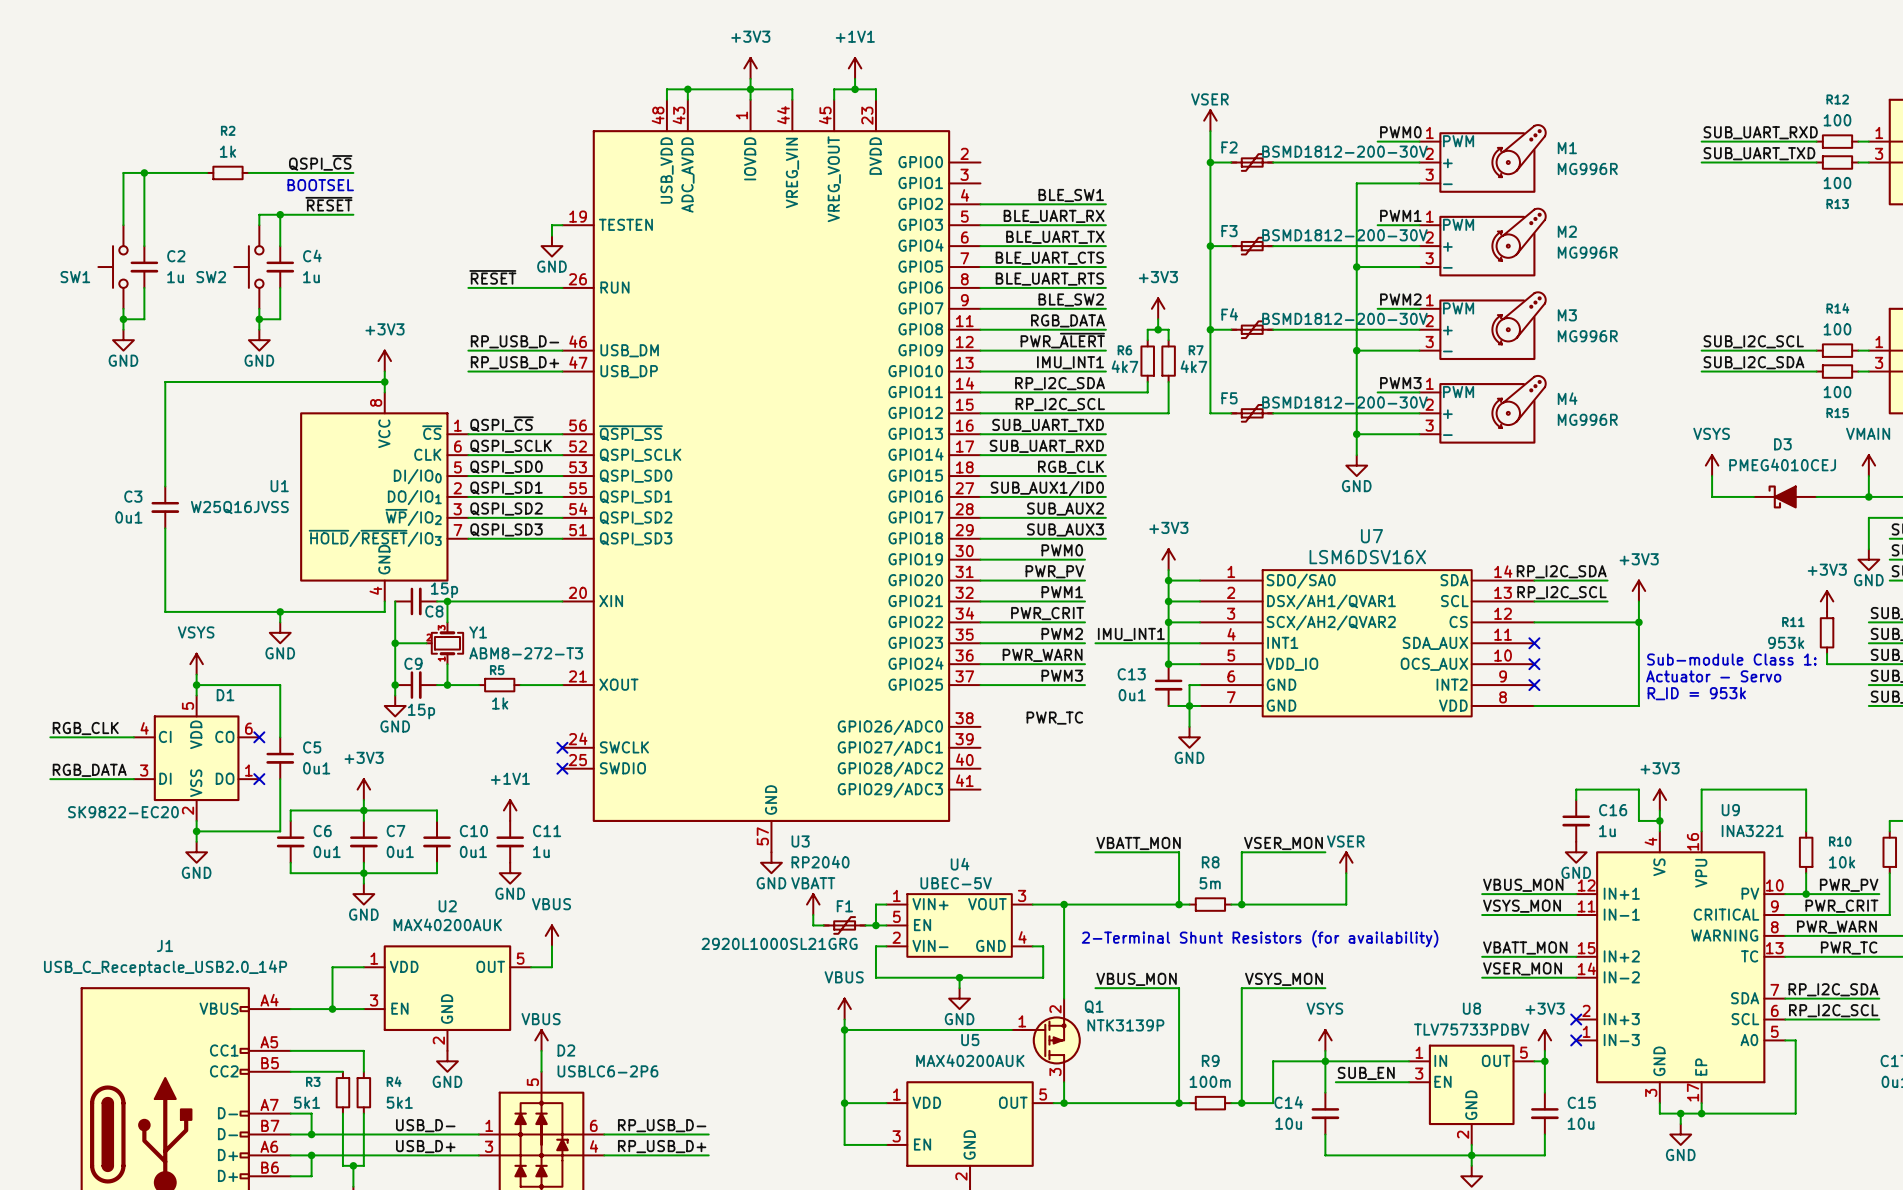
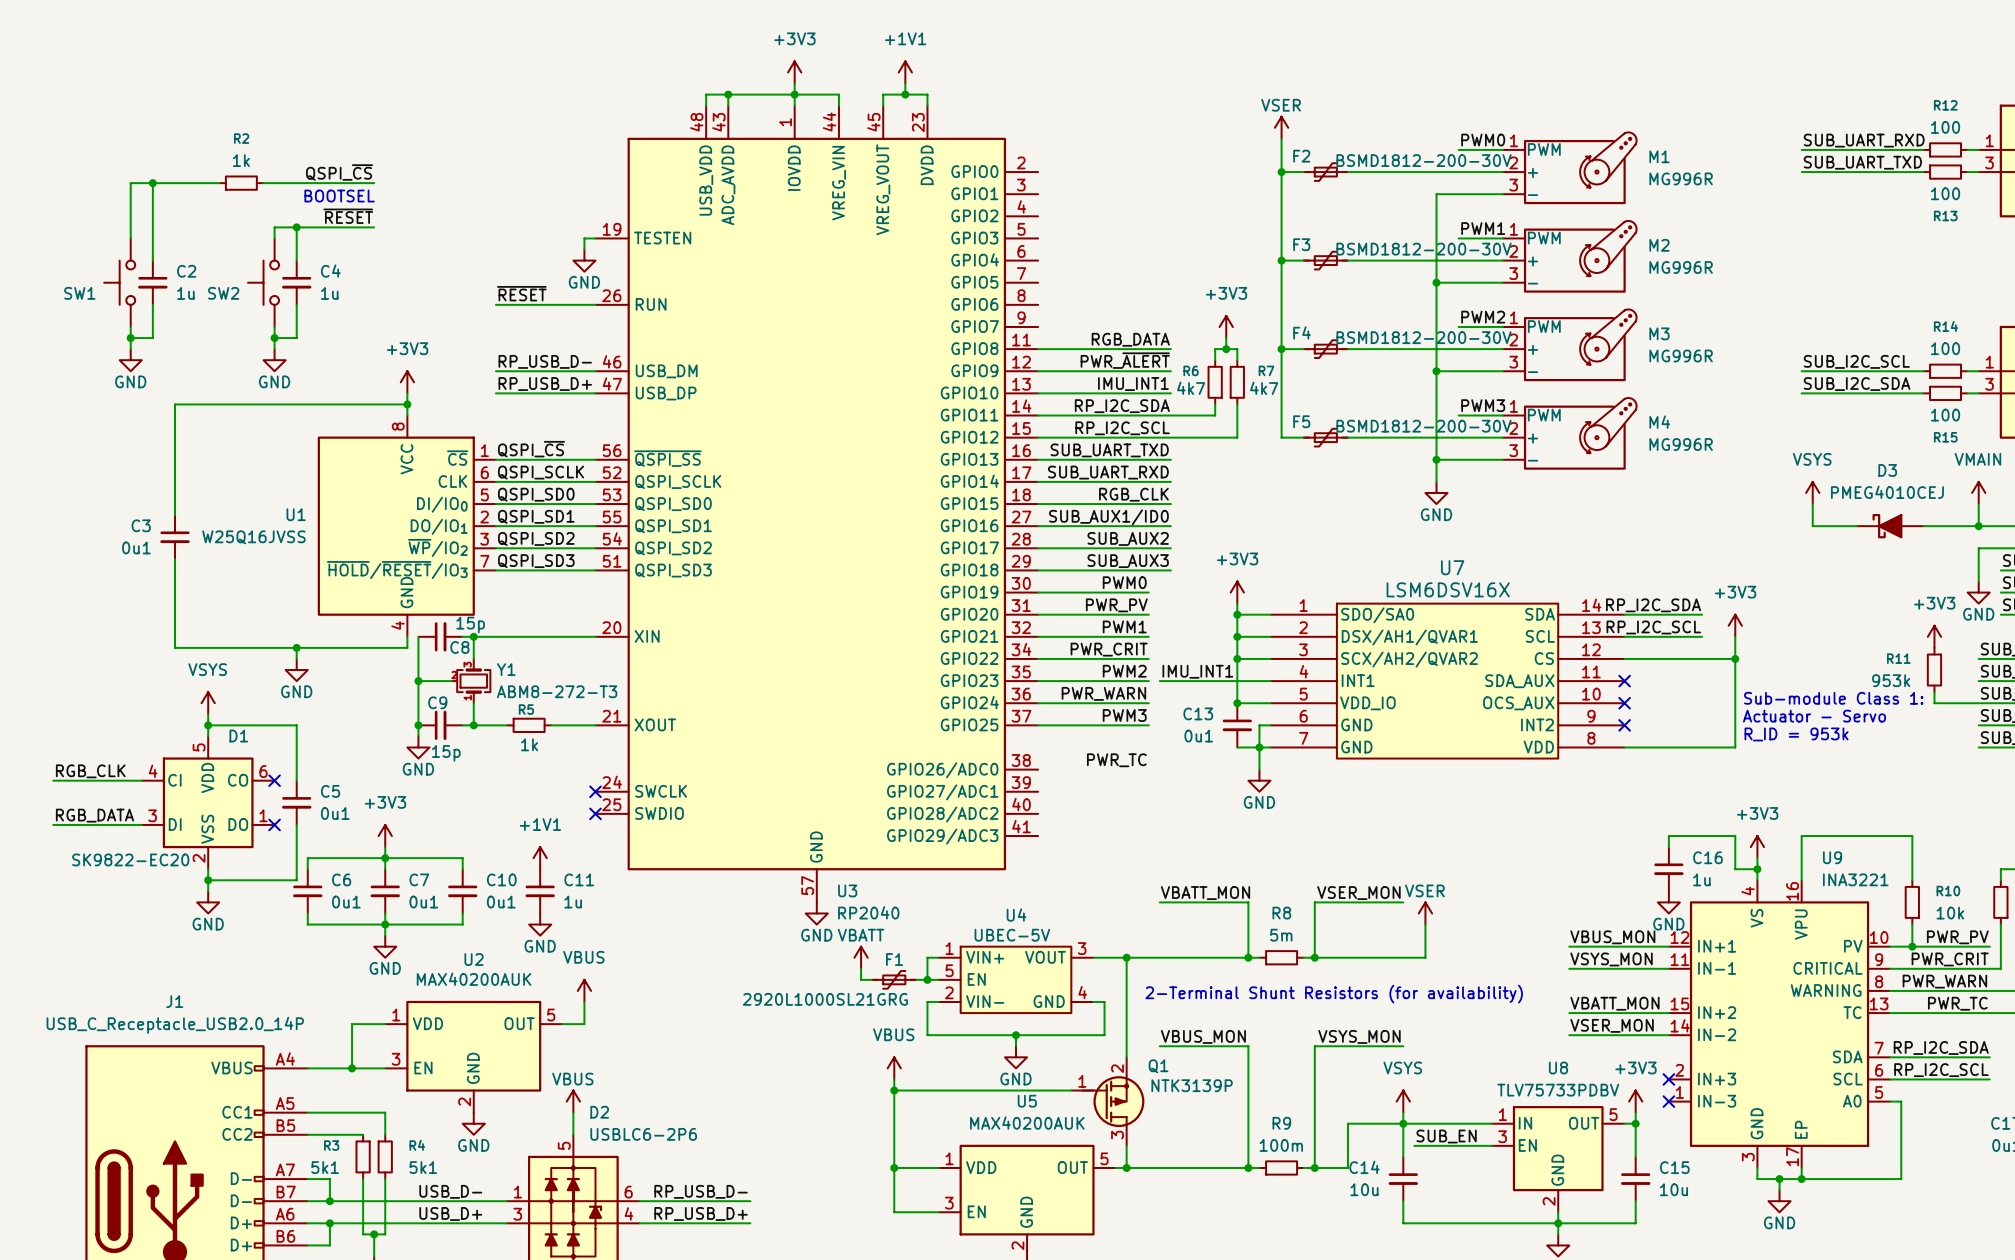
label: BLE_SW1 (1071, 195) -> none
wire: (980, 204) (1105, 204) -> none
label: BLE_UART_RX (1054, 216) -> none
wire: (980, 225) (1105, 225) -> none
label: BLE_UART_TX (1055, 237) -> none
wire: (980, 246) (1105, 246) -> none
label: BLE_UART_CTS (1049, 258) -> none
wire: (980, 267) (1105, 267) -> none
label: BLE_UART_RTS (1049, 279) -> none
wire: (980, 287) (1105, 287) -> none
label: BLE_SW2 (1071, 299) -> none
wire: (980, 308) (1105, 308) -> none

